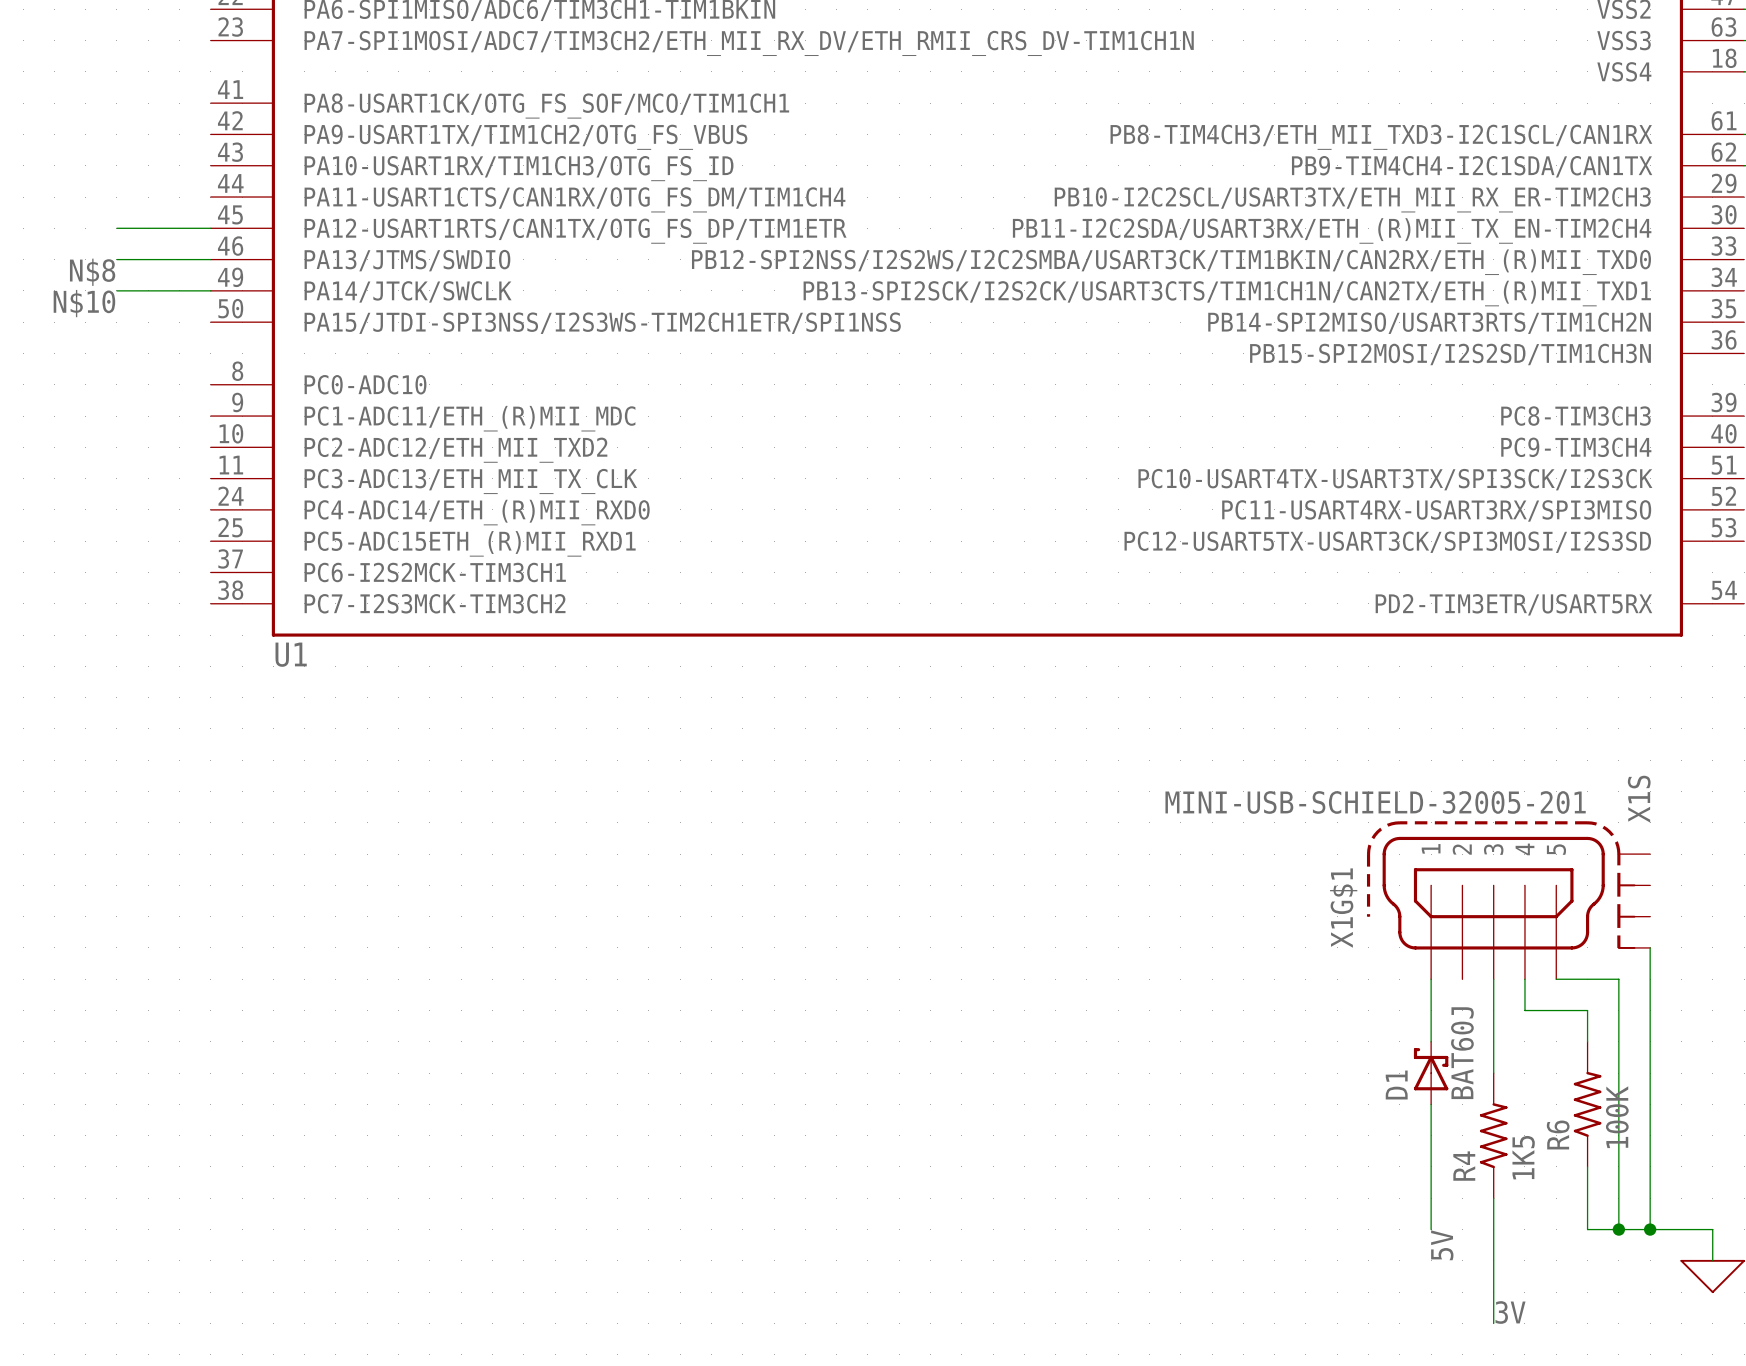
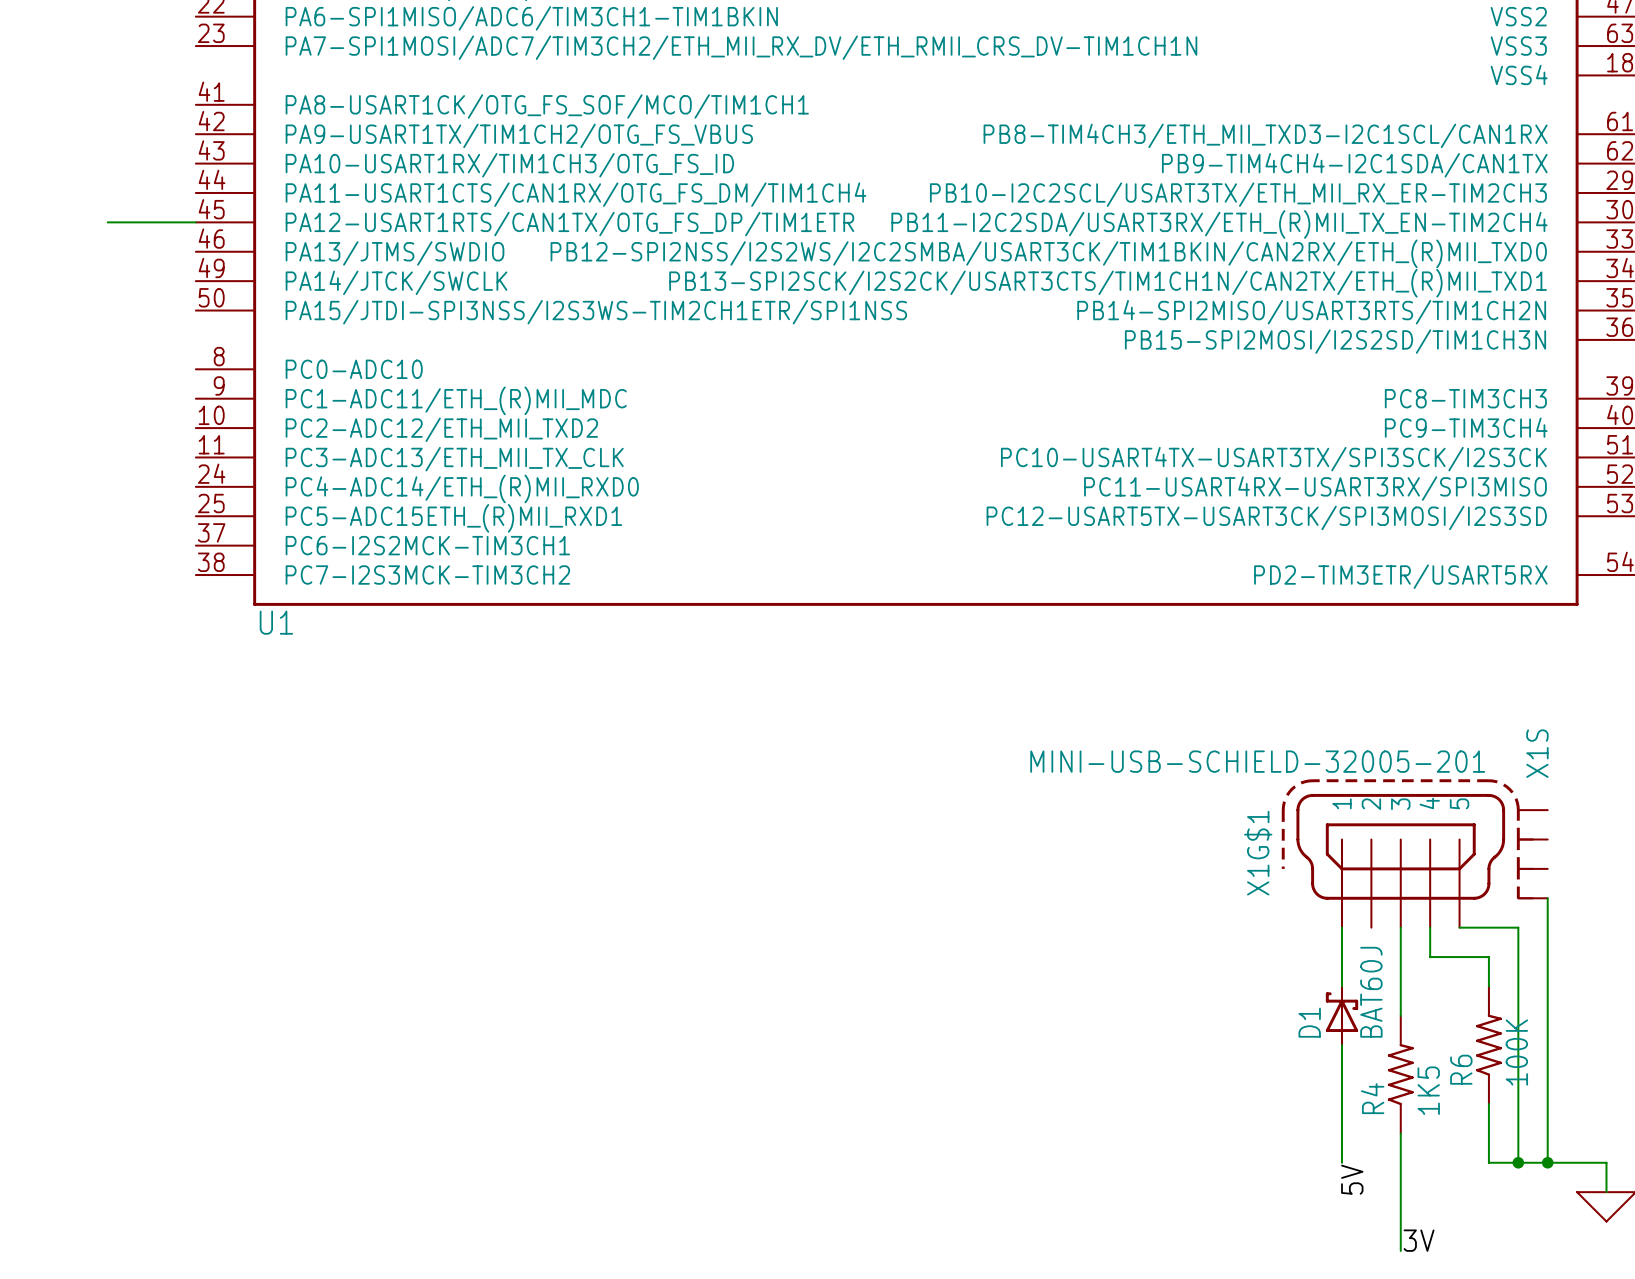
wire: (116, 259) (210, 259) -> none
label: N$8 (92, 272) -> none
wire: (116, 290) (210, 290) -> none
label: N$10 (84, 303) -> none

